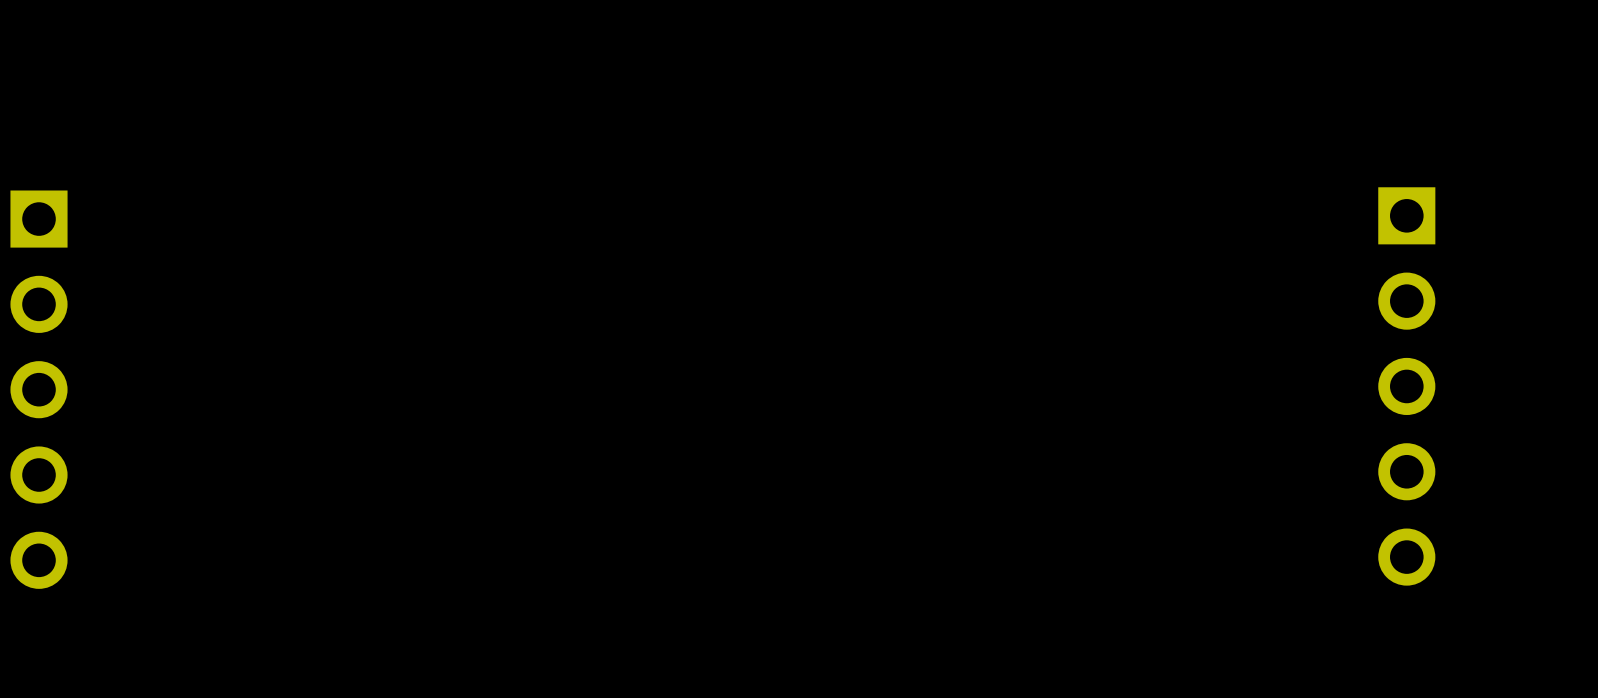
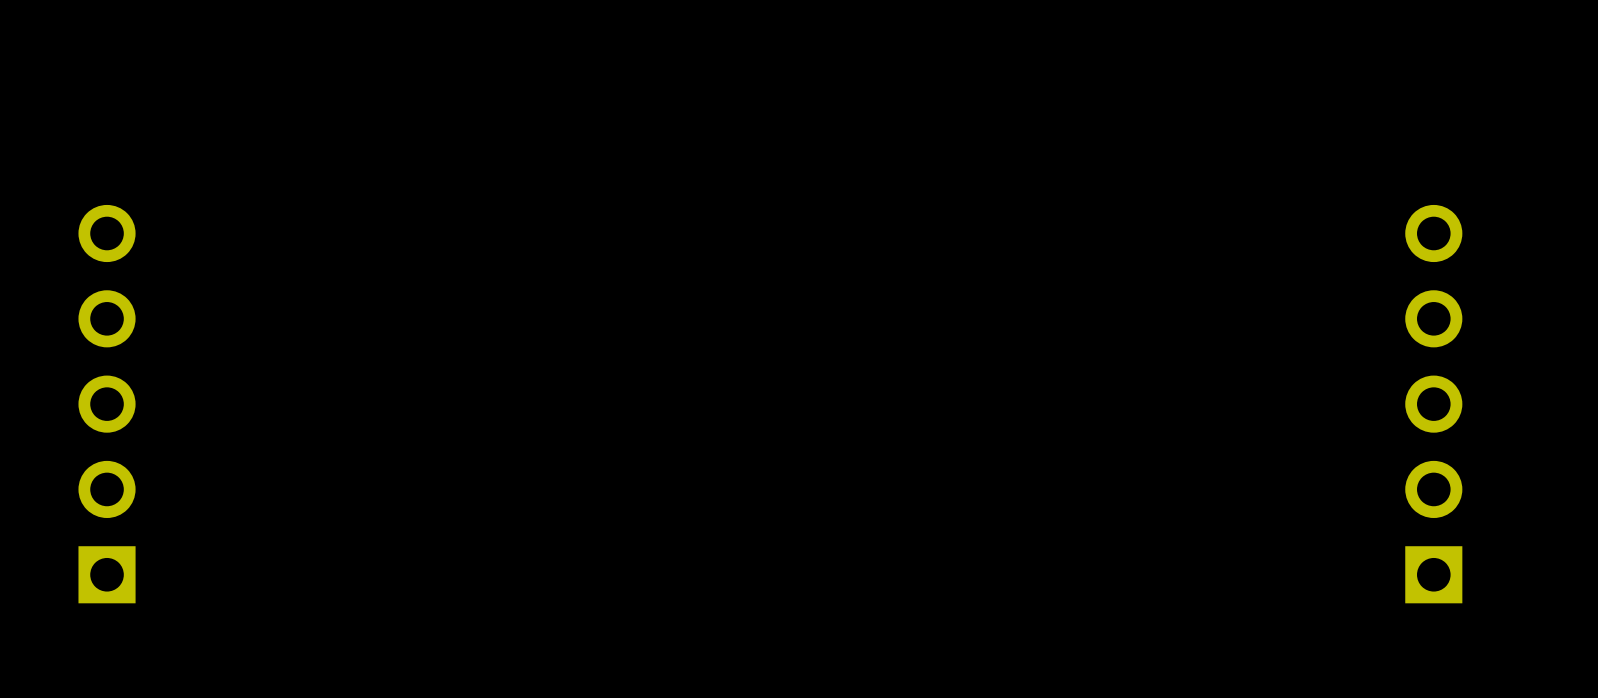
part rotation: 0° (1406, 386) -> 180° (1433, 404)
part rotation: 0° (39, 389) -> 180° (107, 404)

